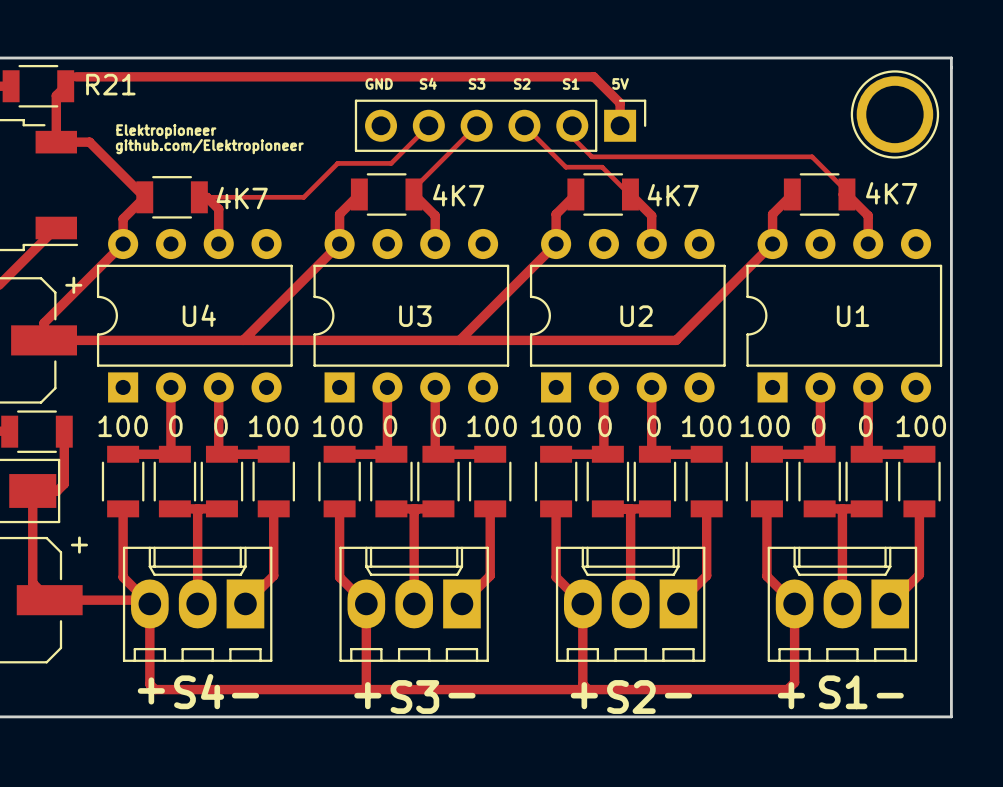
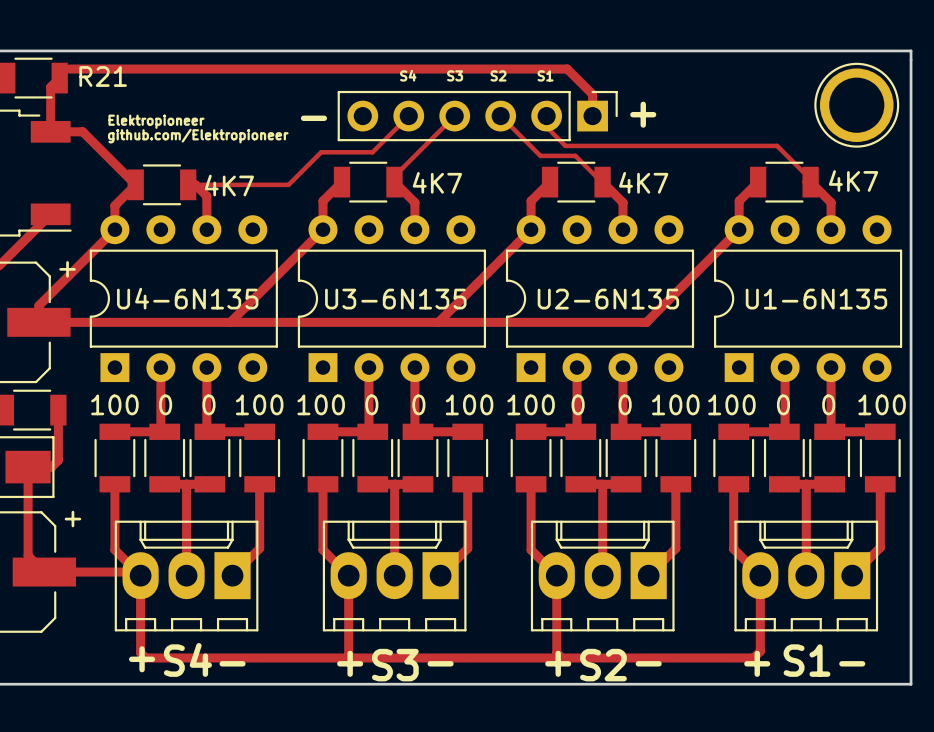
text: GND (379, 83) -> none
text: 5V (620, 83) -> none
text: none -> + (643, 114)
text: none -> - (313, 118)
U4 name: U4 (199, 315) -> U4-6N135 (187, 298)
U3 name: U3 (415, 316) -> U3-6N135 (395, 299)
U2 name: U2 (636, 316) -> U2-6N135 (608, 299)
U1 name: U1 (853, 316) -> U1-6N135 (816, 299)

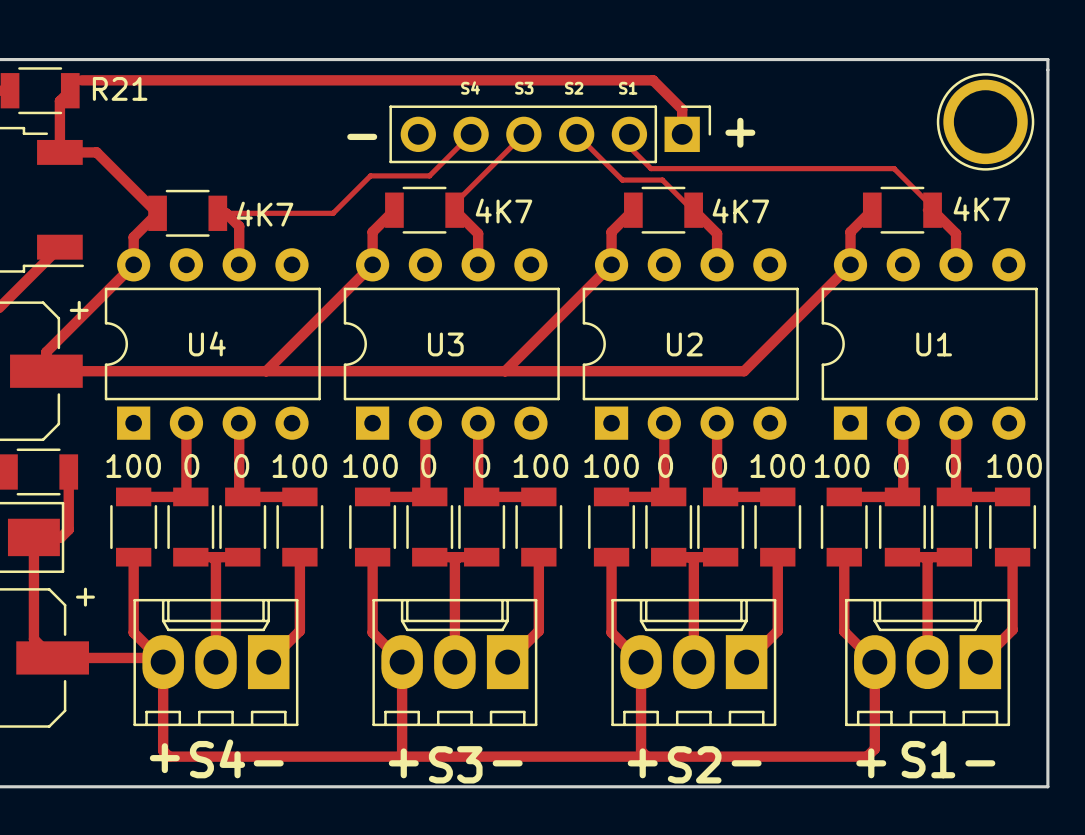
text: Elektropioneer (156, 121) -> none
text: github.com/Elektropioneer (198, 136) -> none
U4-6N135 name: U4-6N135 (187, 298) -> U4 (207, 343)
U3-6N135 name: U3-6N135 (395, 299) -> U3 (445, 344)
U2-6N135 name: U2-6N135 (608, 299) -> U2 (684, 344)
U1-6N135 name: U1-6N135 (816, 299) -> U1 (934, 344)

